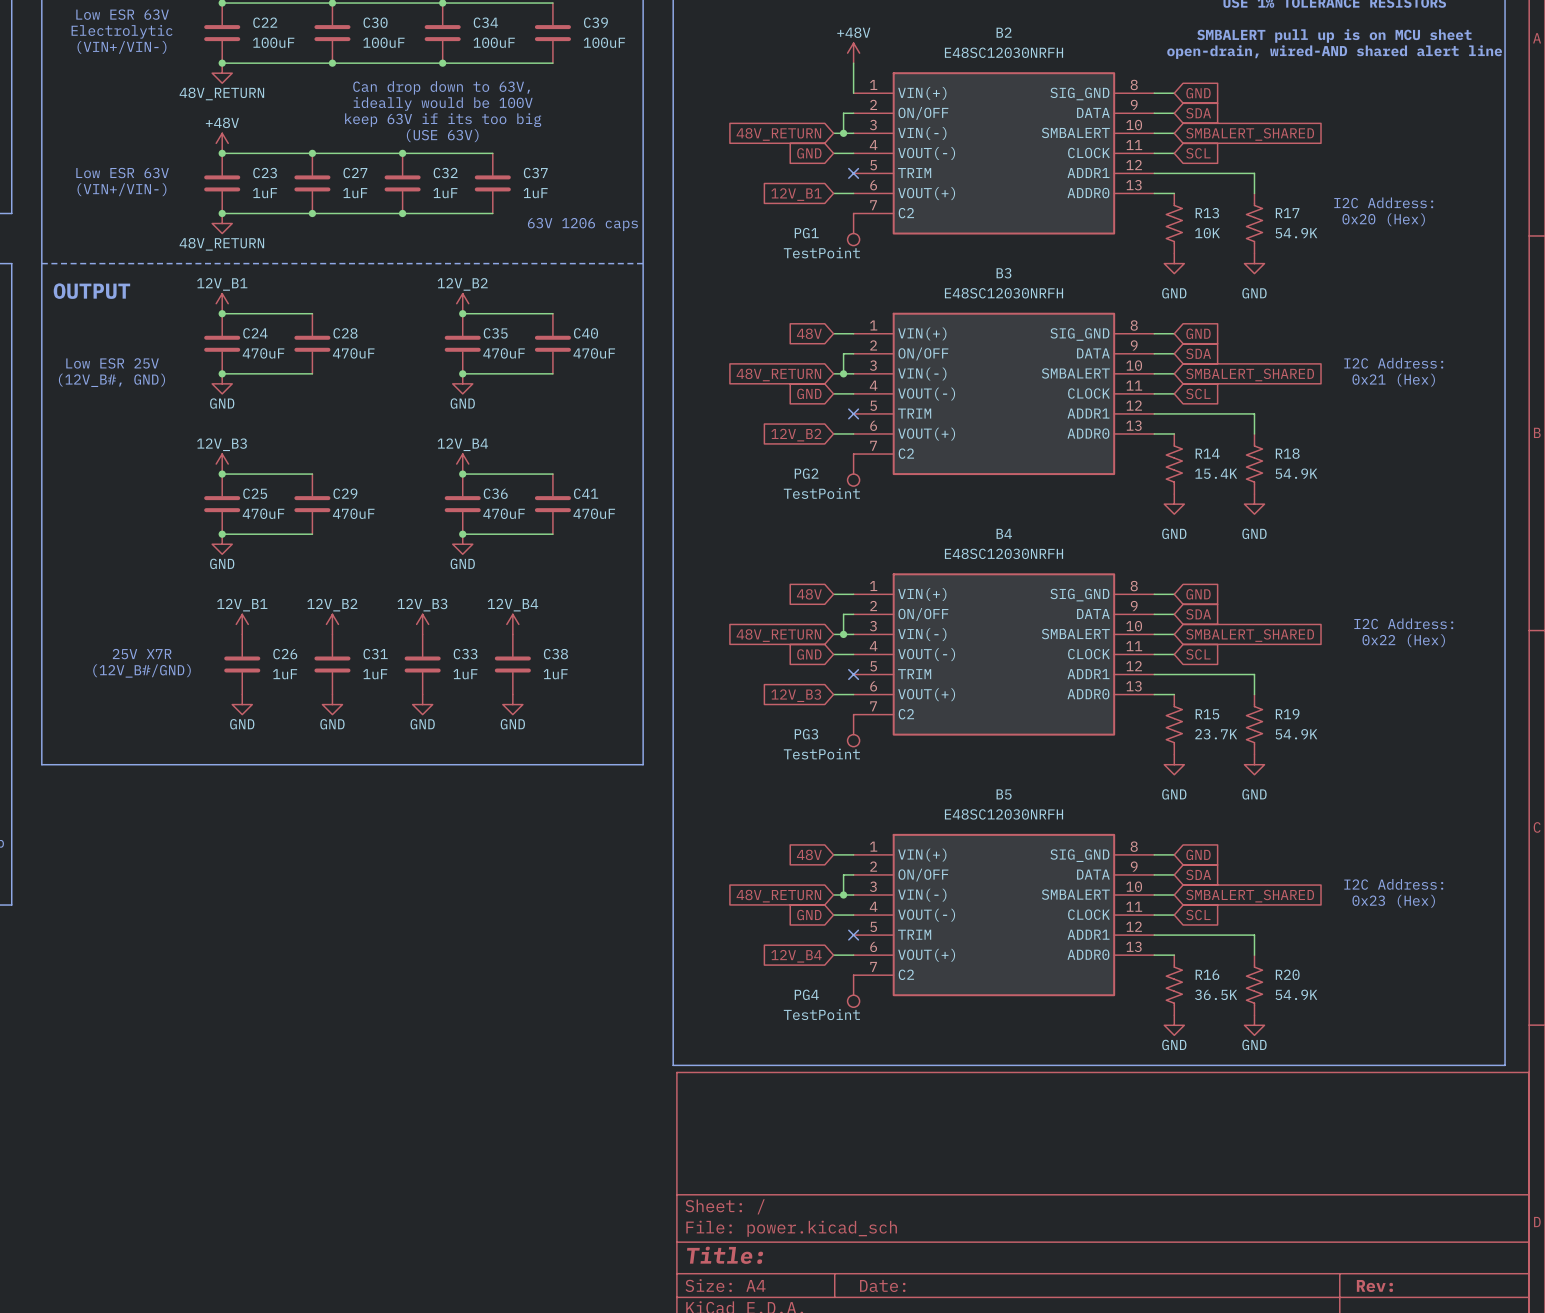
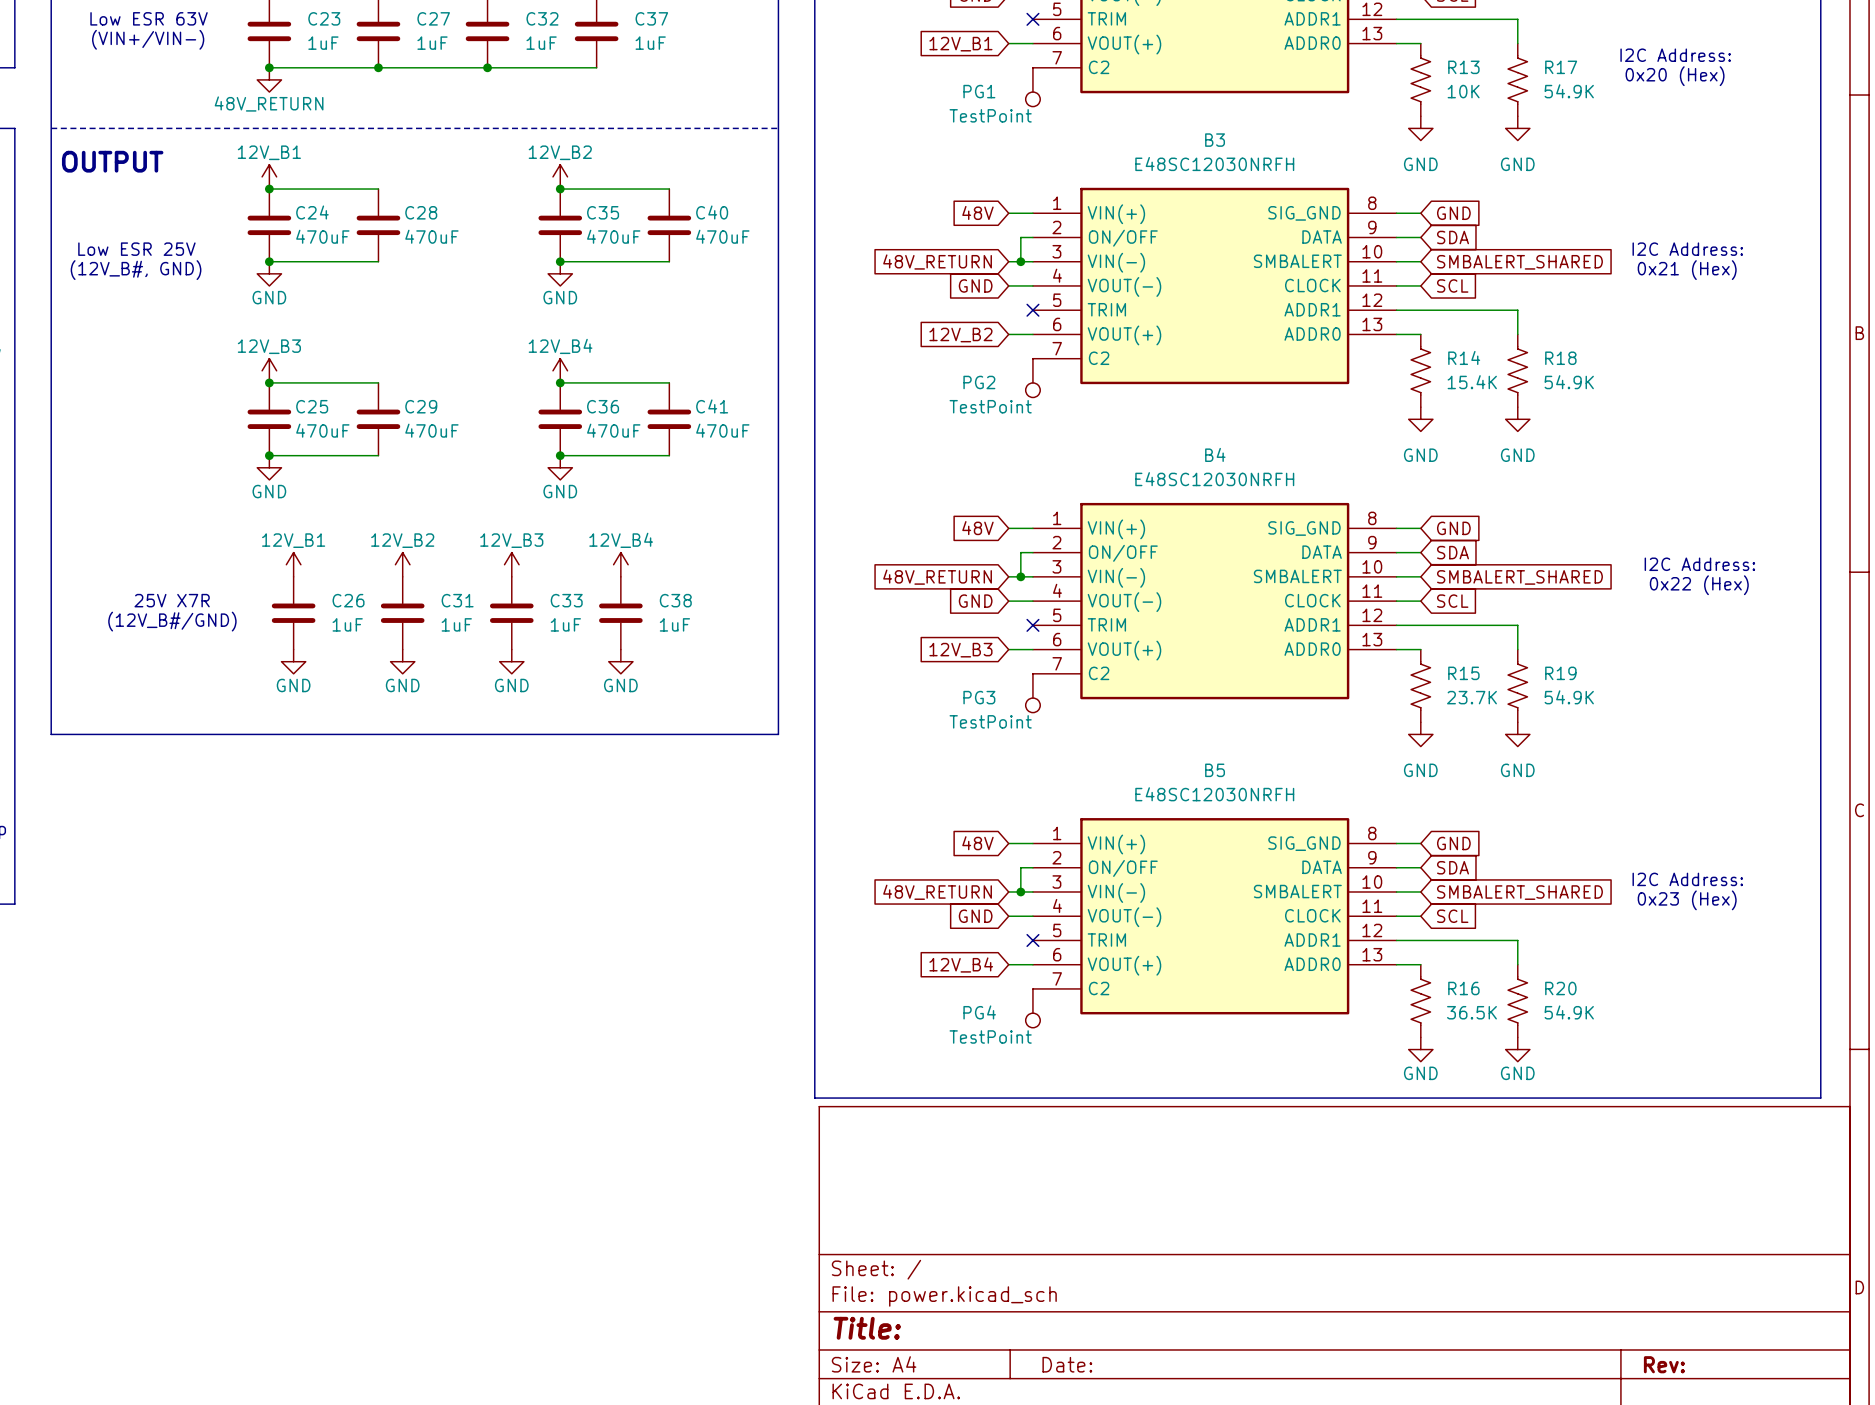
text: 63V 1206 caps (582, 224) -> none

